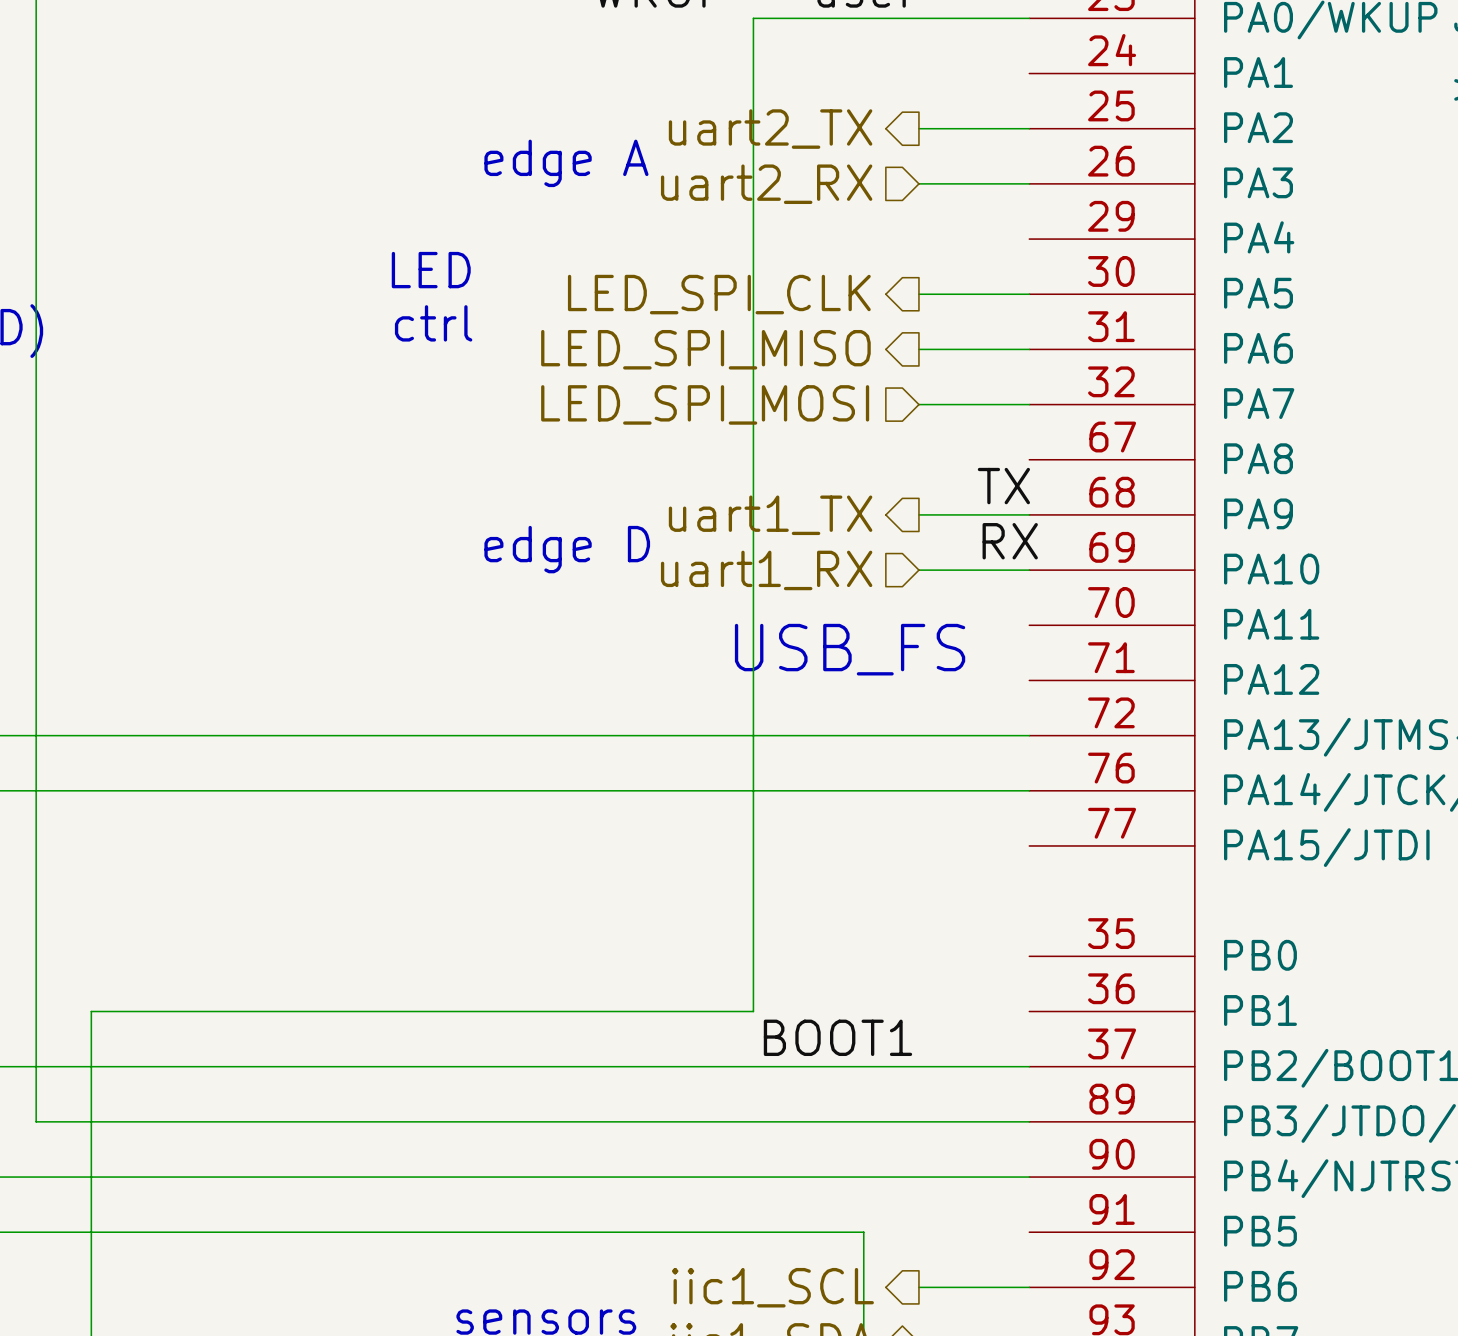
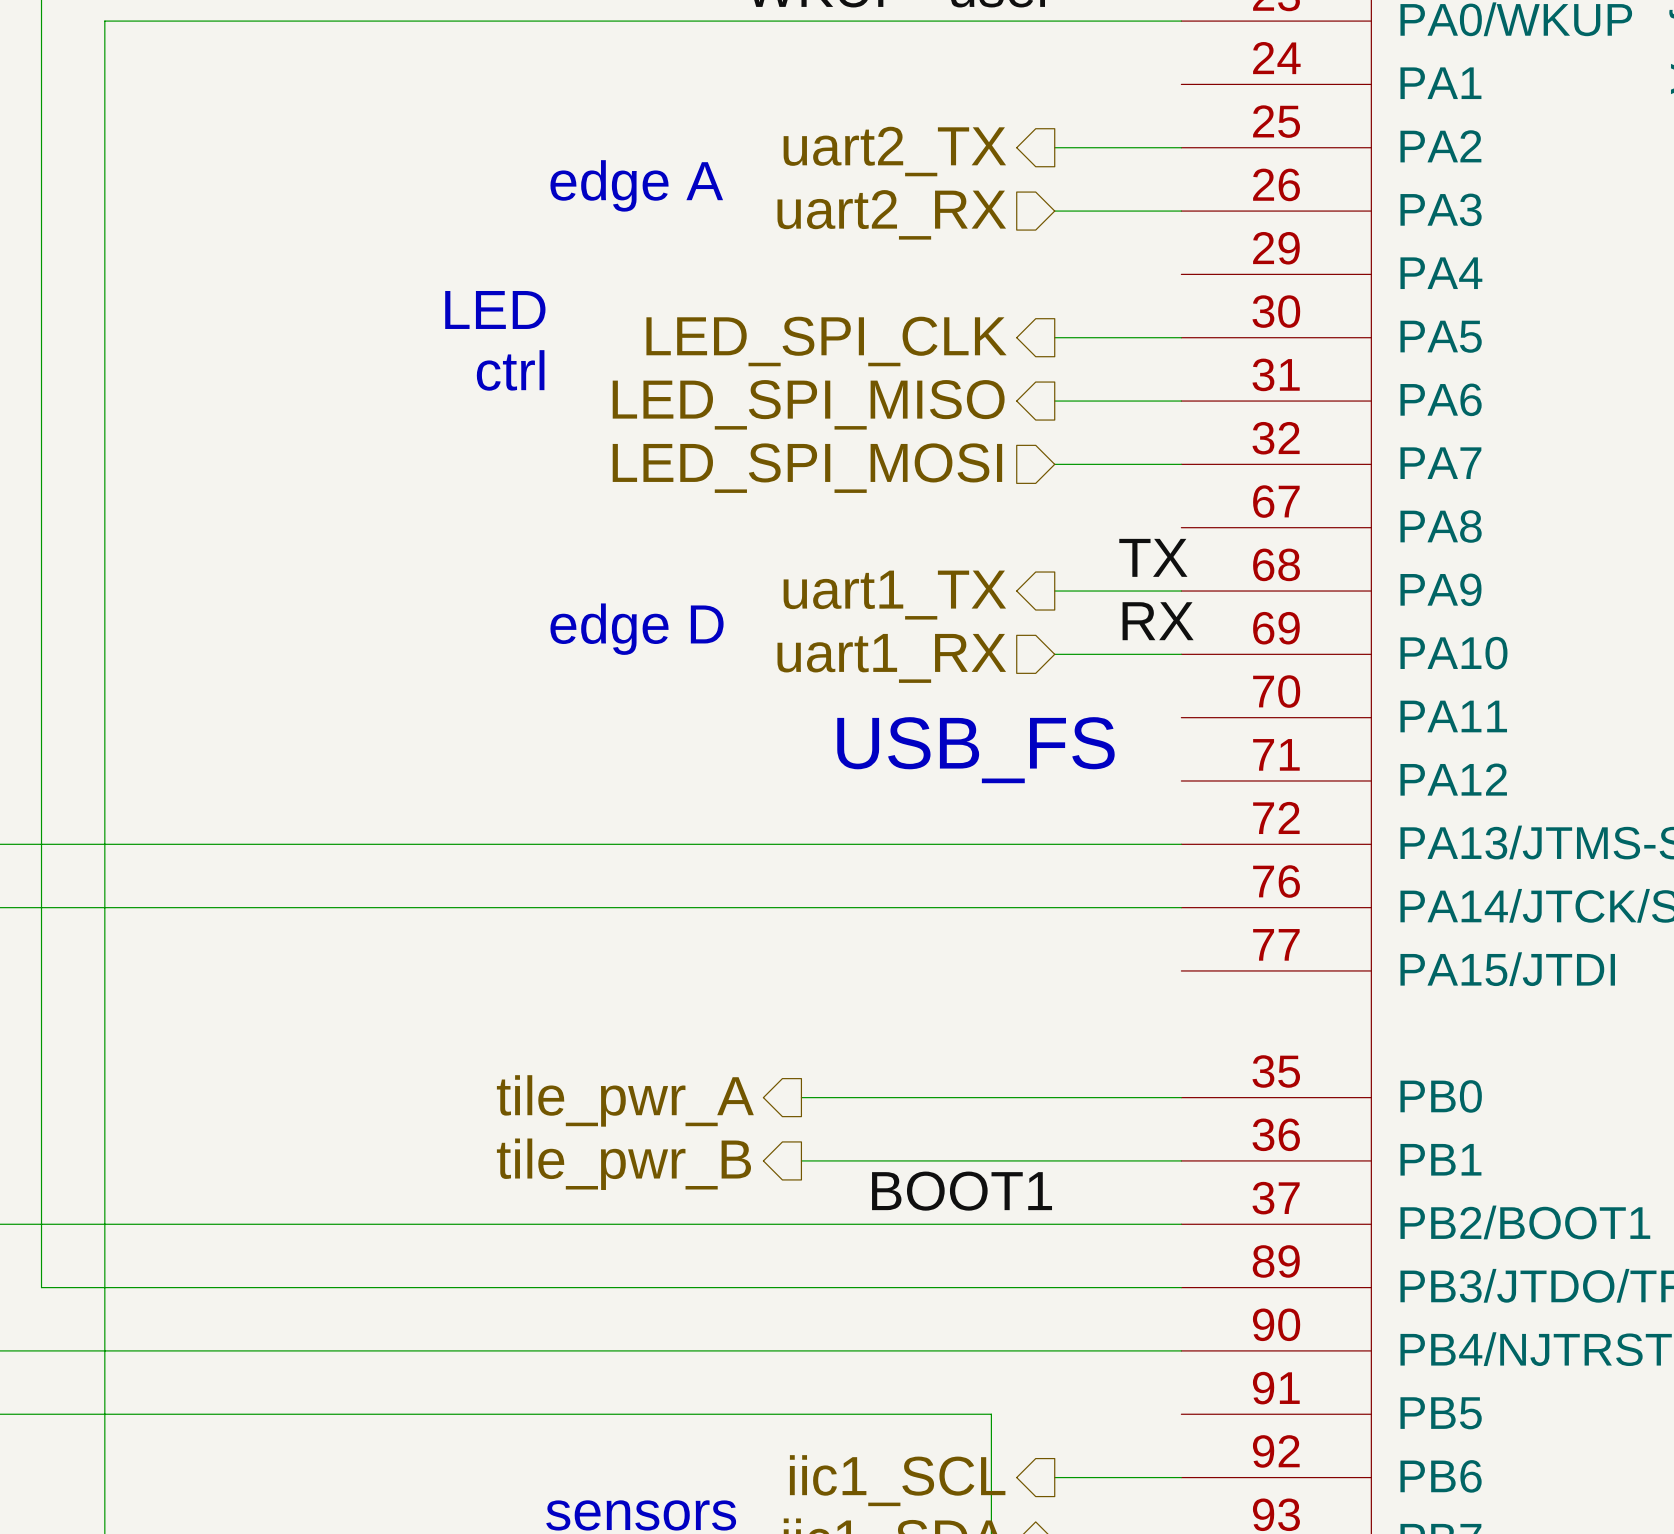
wire: (753, 18) (753, 1011) -> (864, 21) (104, 21) (104, 1160)
wire: none -> (801, 1097) (1181, 1097)
hierarchical label: none -> tile_pwr_A (625, 1100)
wire: (91, 1011) (698, 1011) -> none
wire: none -> (864, 1160) (1181, 1160)
hierarchical label: none -> tile_pwr_B (623, 1164)

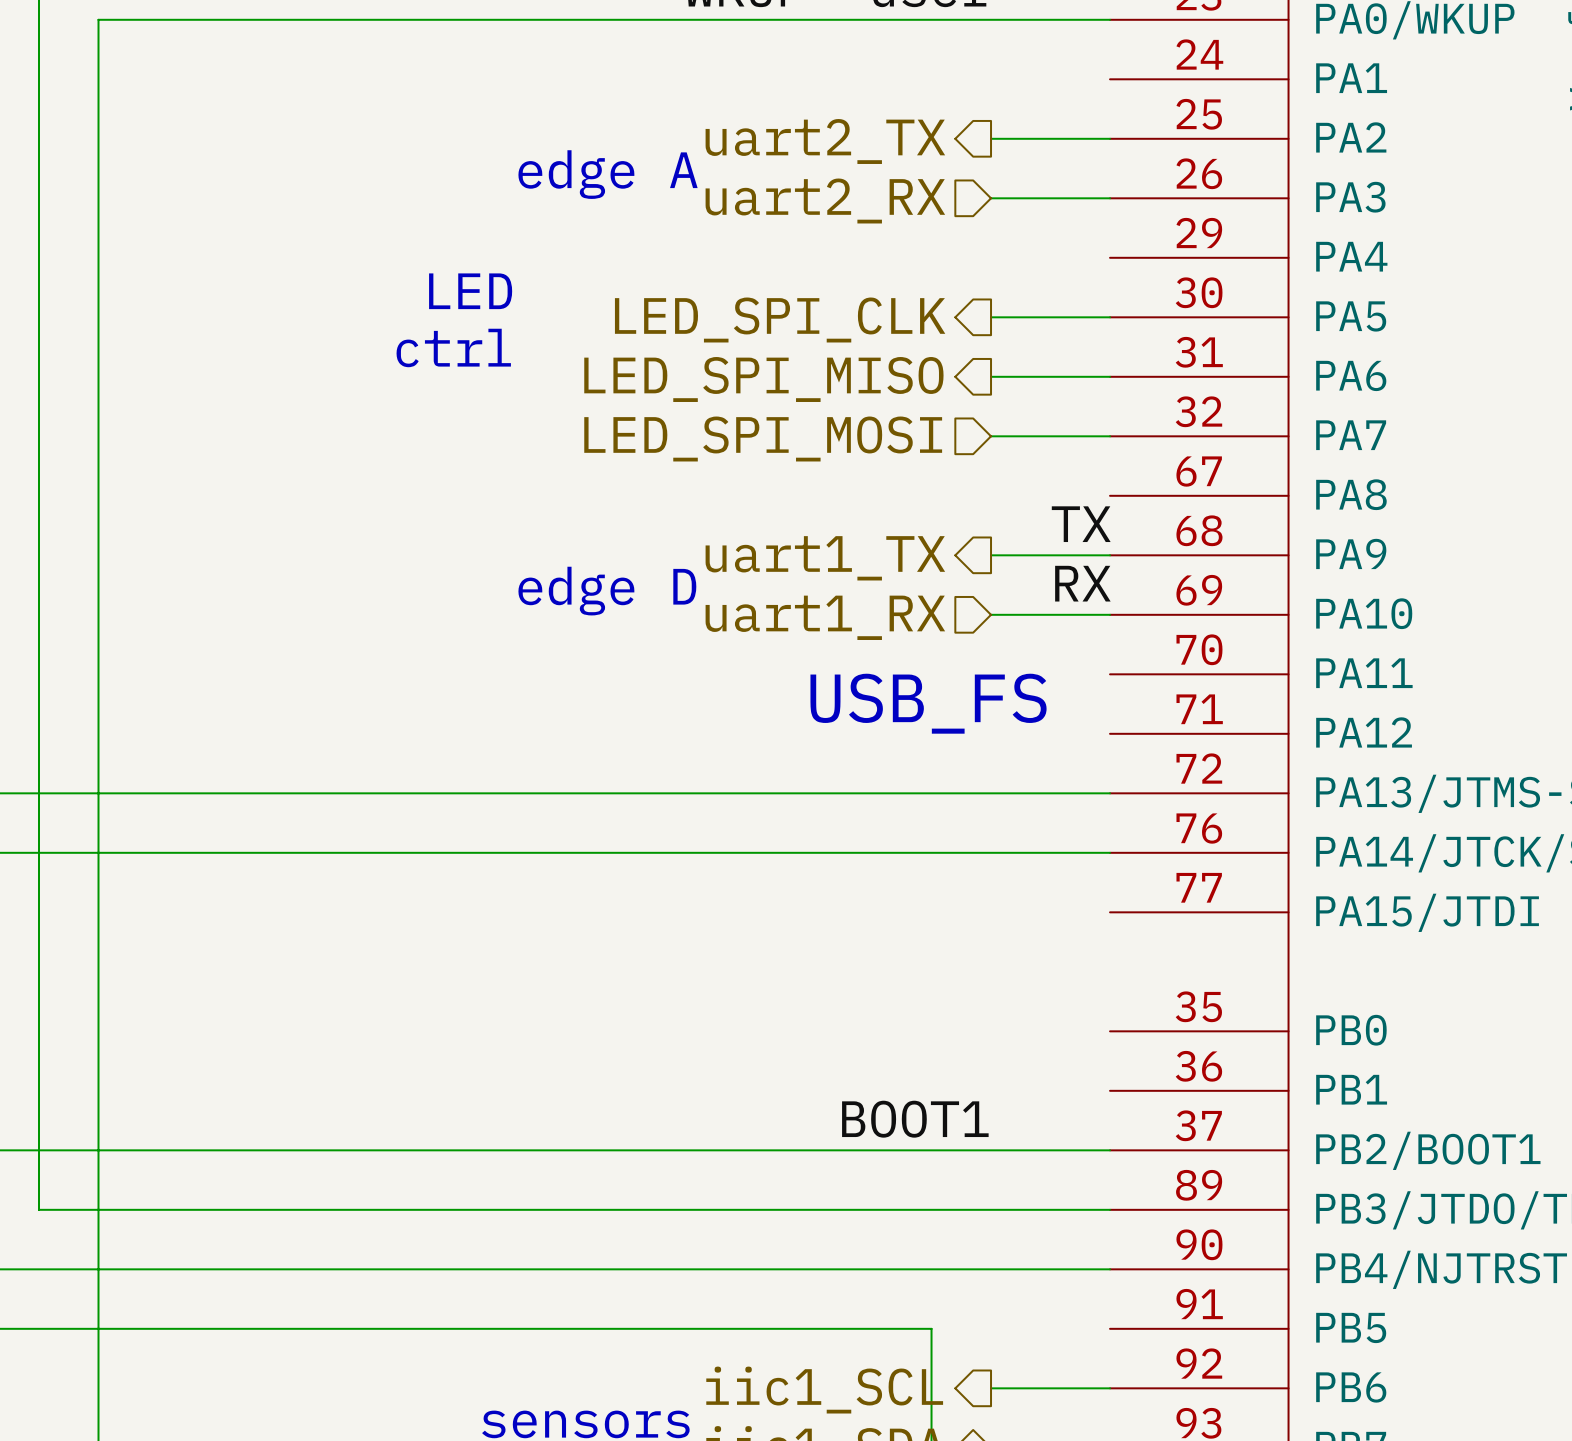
wire: (801, 1097) (1181, 1097) -> none
hierarchical label: tile_pwr_A (625, 1100) -> none
wire: (801, 1160) (1181, 1160) -> none
hierarchical label: tile_pwr_B (623, 1164) -> none

